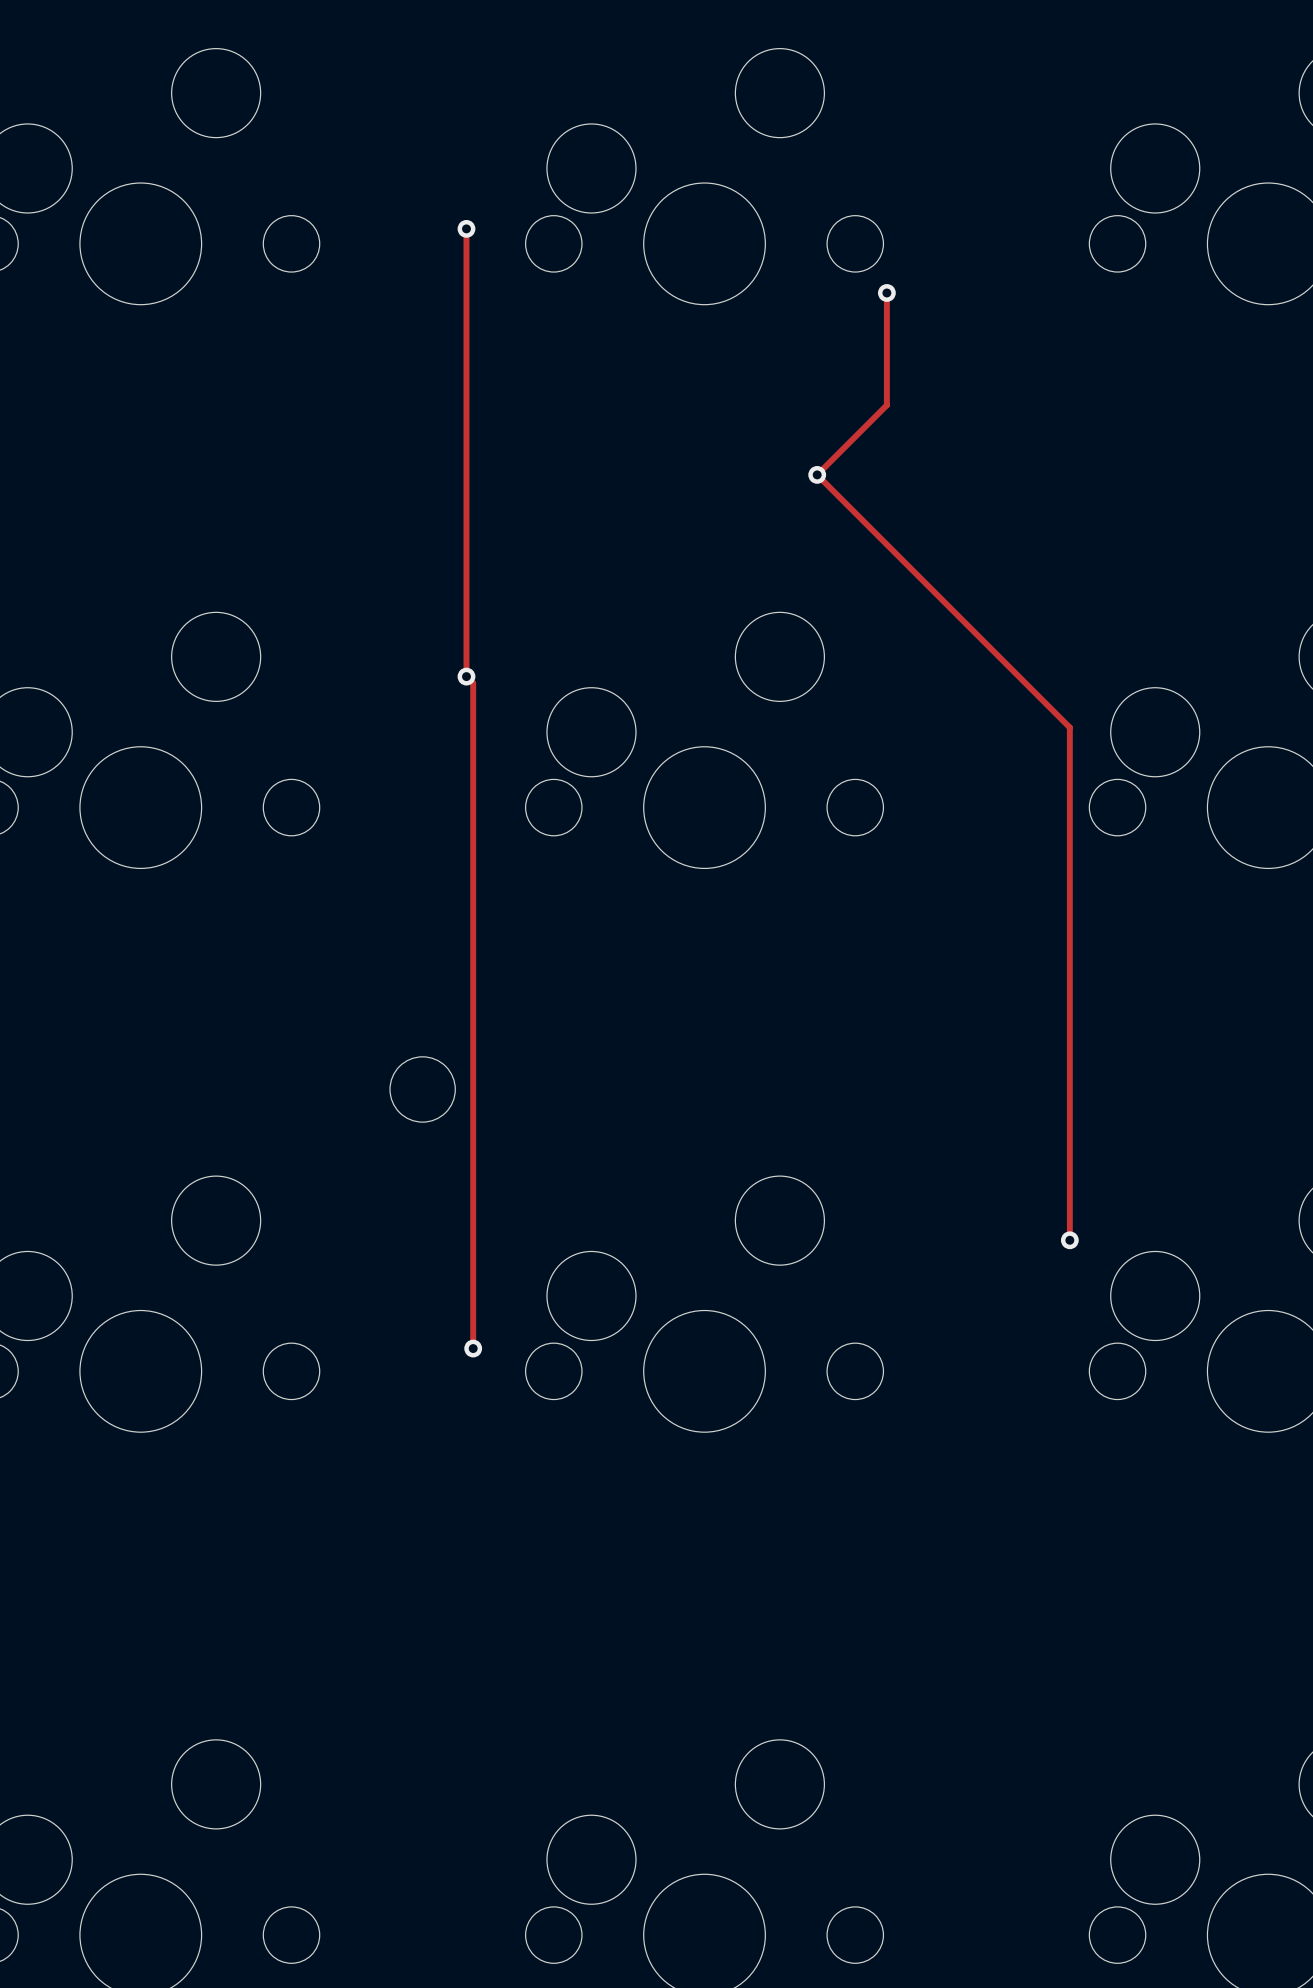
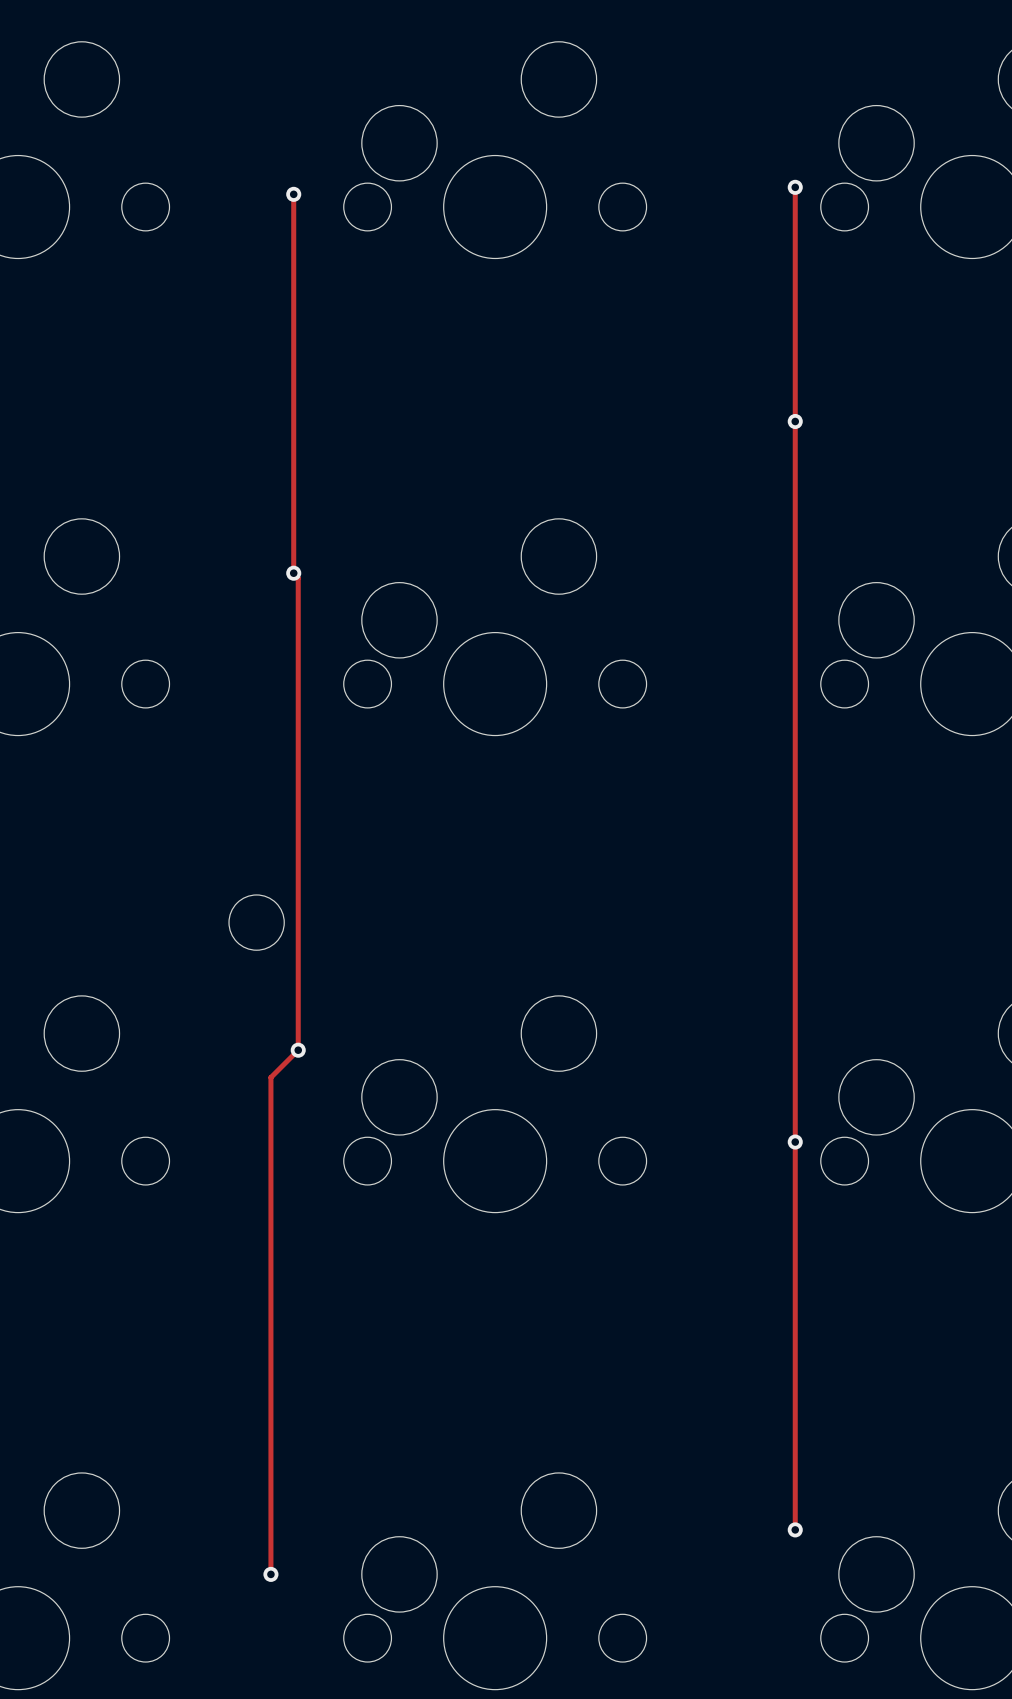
track: none -> (795, 187) (795, 1529)
via: none -> (795, 187)
track: (886, 292) (886, 405) (817, 474) (1069, 727) (1069, 1240) -> none
via: (886, 292) -> none
via: (817, 474) -> none
via: none -> (795, 421)
track: (466, 676) (473, 683) (473, 1348) -> (293, 573) (298, 578) (298, 1050) (270, 1077) (270, 1574)
via position: (1069, 1240) -> (795, 1142)
via position: (473, 1348) -> (298, 1050)
via: none -> (795, 1529)
via: none -> (270, 1574)

